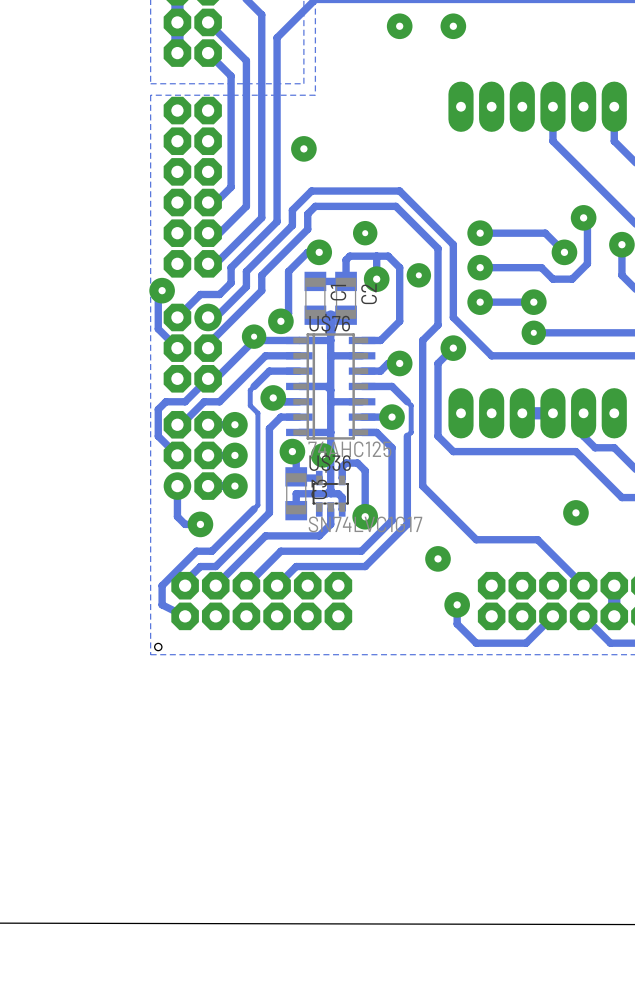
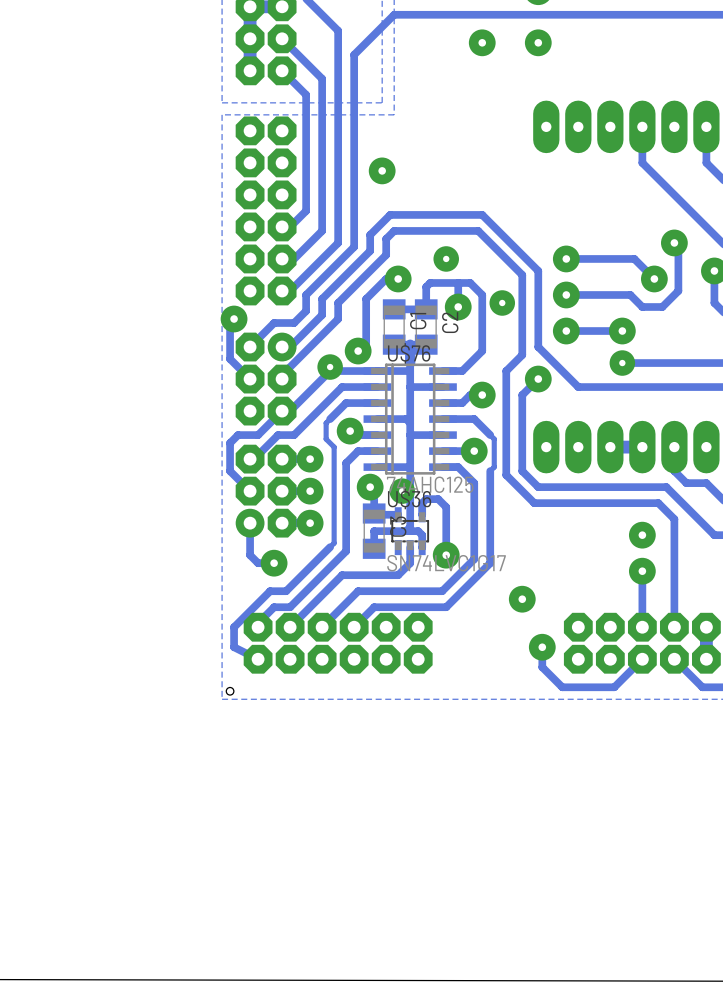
track: (422, 440) (422, 486) (476, 539) (537, 539) (583, 585) -> (506, 475) (534, 503) (658, 503) (674, 519) (674, 627)
via: none -> (642, 535)
via: (575, 512) -> none
track: none -> (642, 571) (642, 627)
via: none -> (642, 571)

